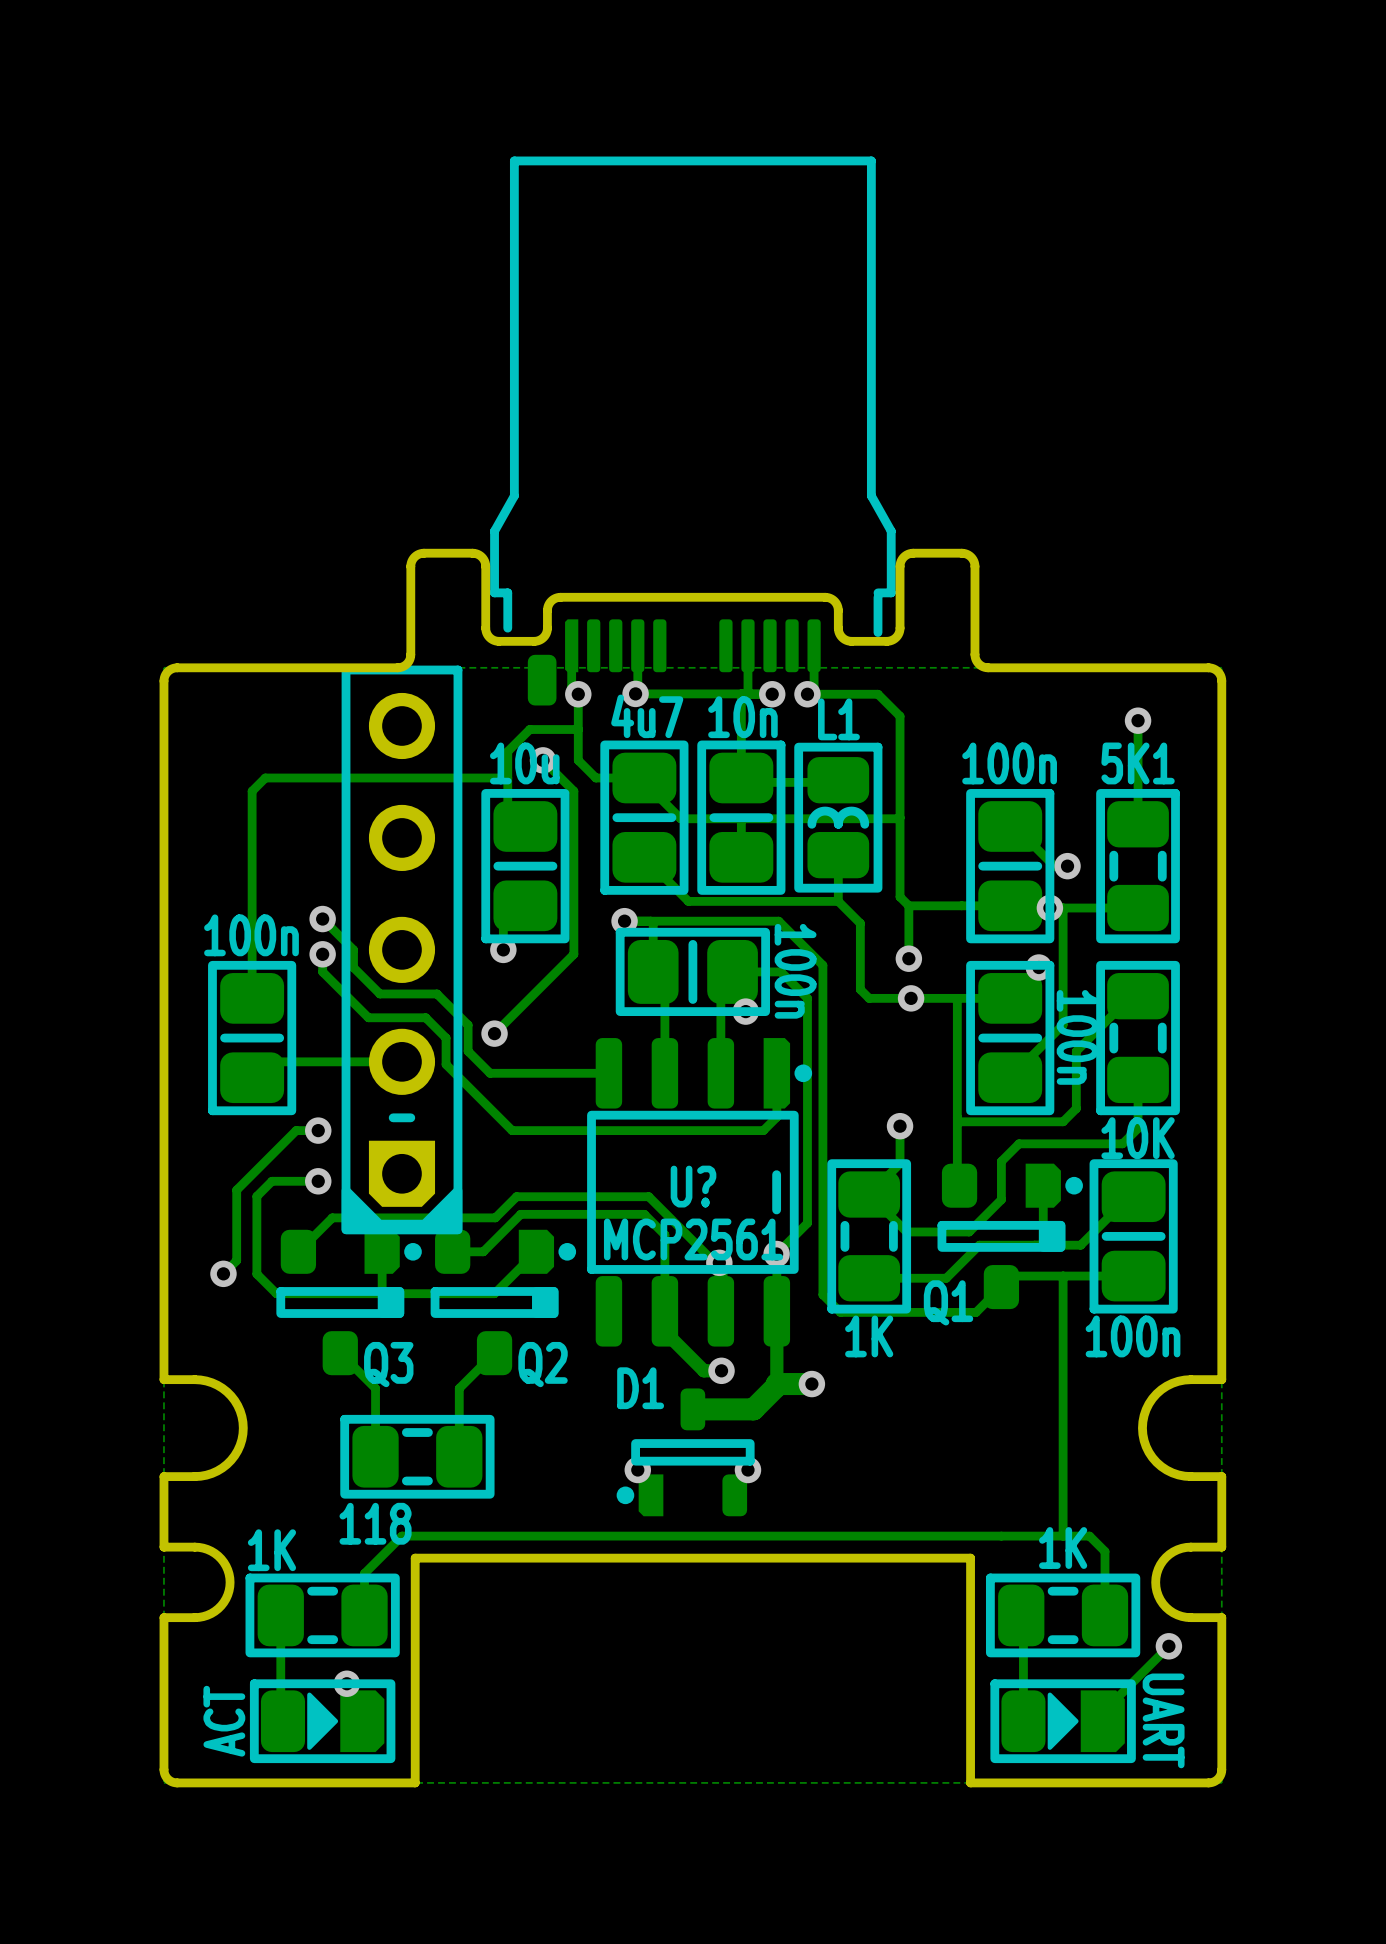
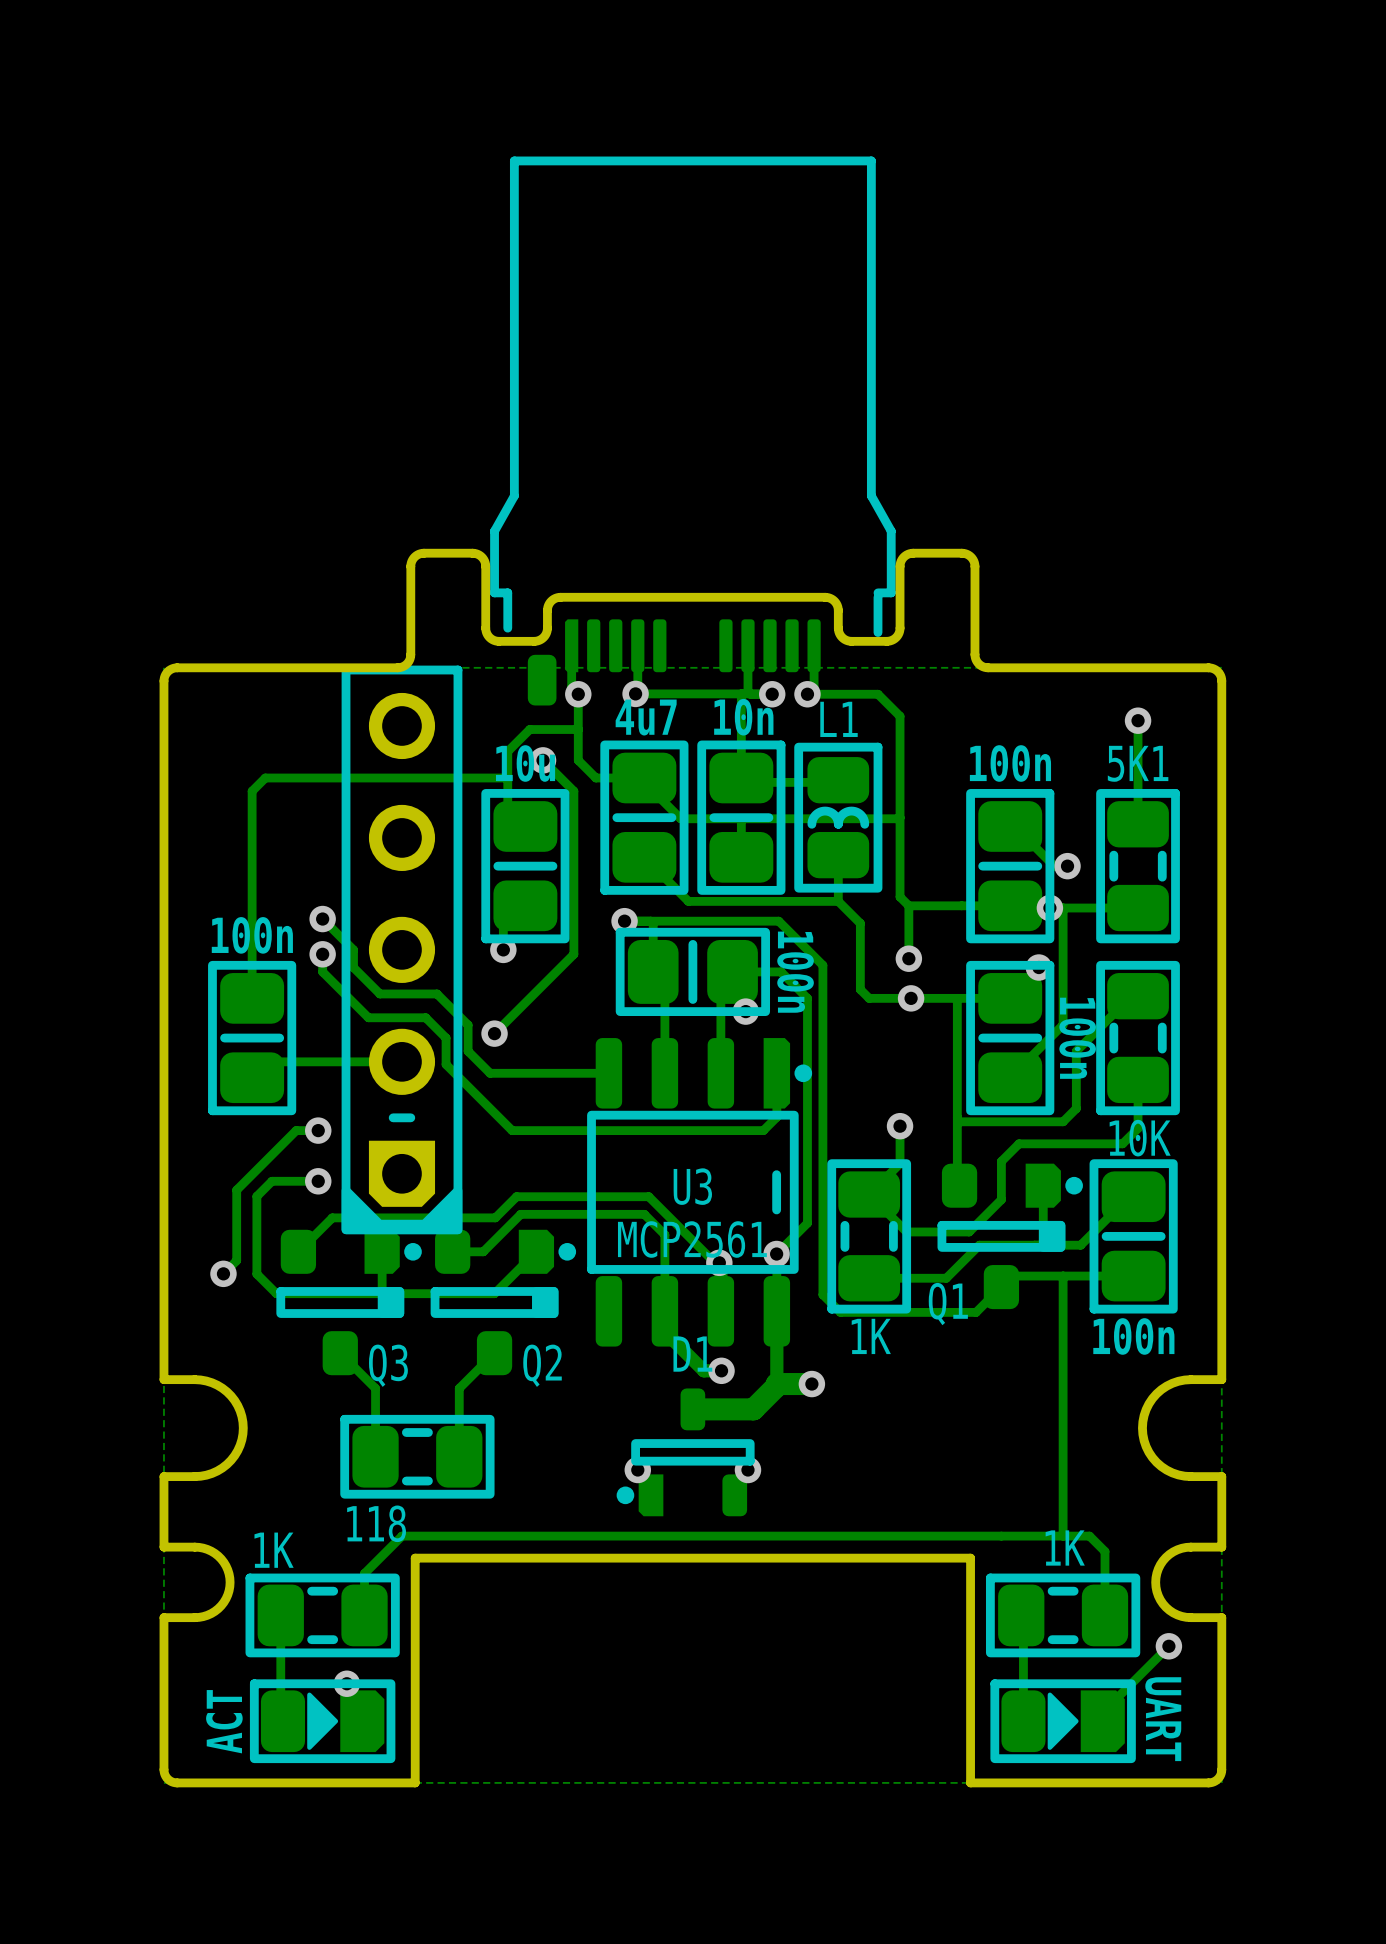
U? name: U? (693, 1186) -> U3 (692, 1186)
D1 name position: D1 (640, 1388) -> D1 (692, 1354)

